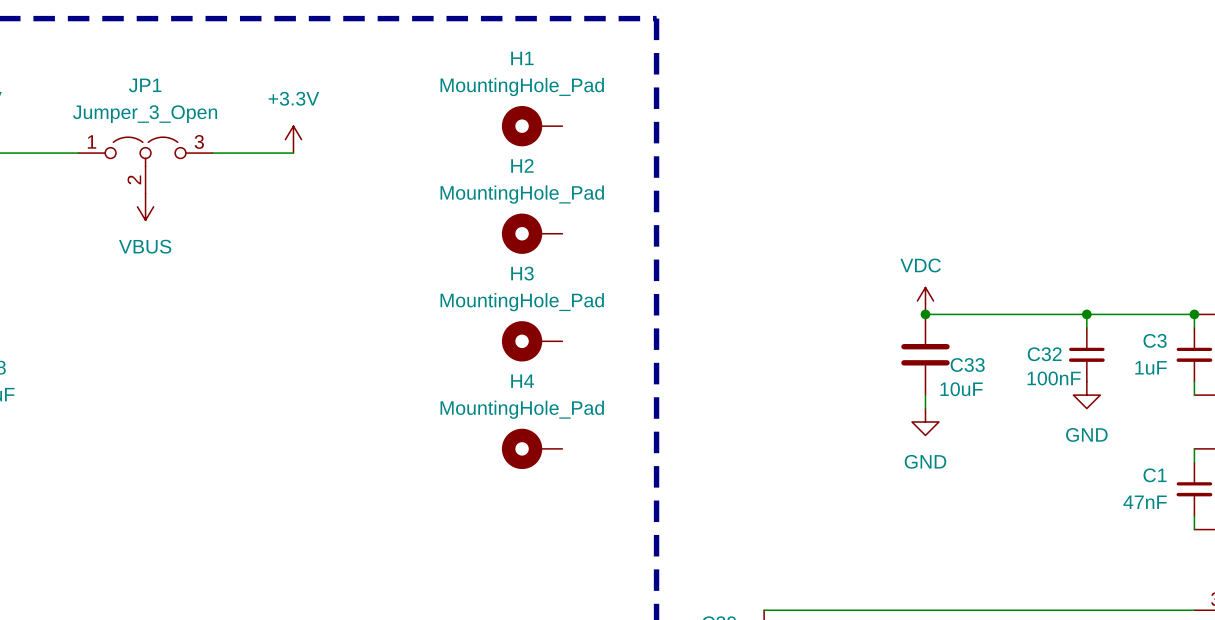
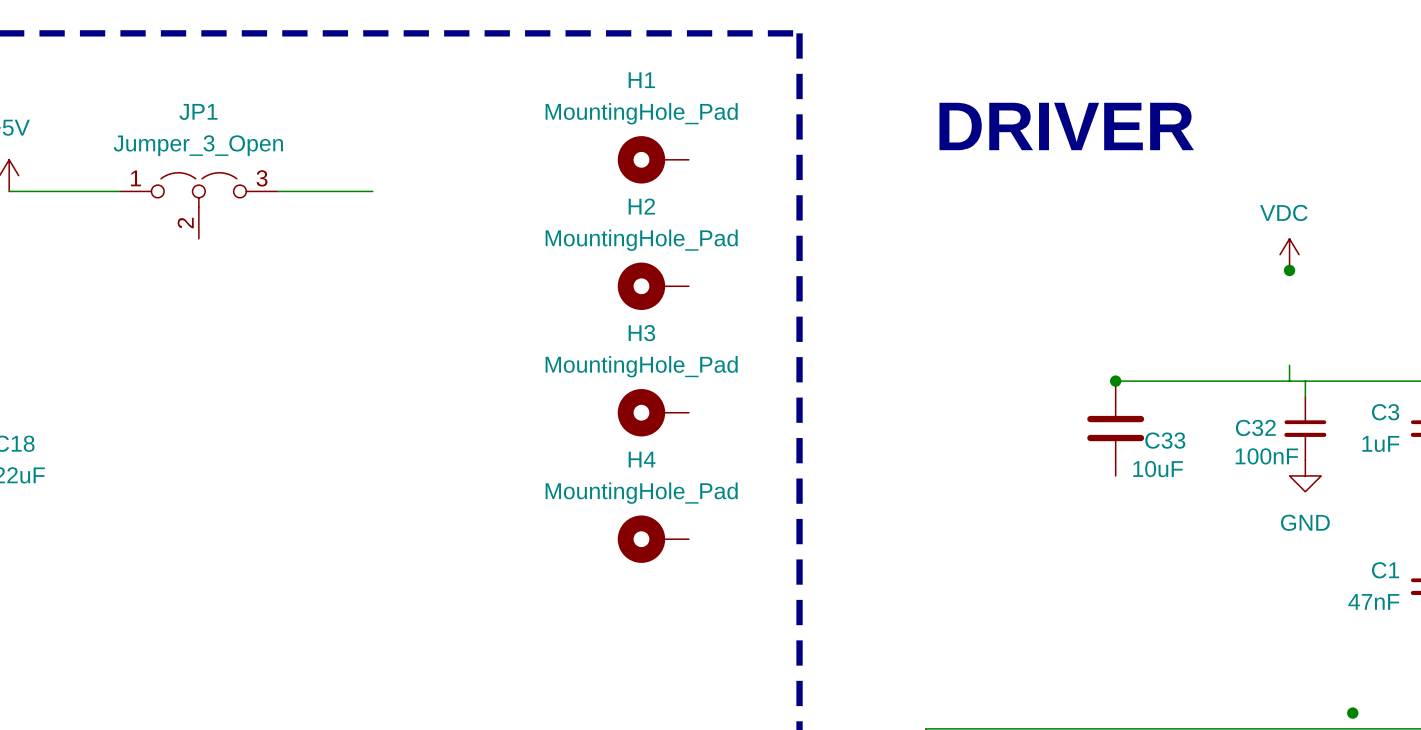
text: none -> DRIVER (1066, 126)
power symbol: +3.3V (293, 139) -> none
power symbol: VBUS (145, 206) -> none
junction: none -> (1289, 270)
power symbol position: VDC (925, 300) -> VDC (1289, 254)
junction: (1086, 314) -> none
wire: (925, 395) (925, 408) -> (1289, 365) (1289, 381)
power symbol: GND (925, 422) -> none
junction: none -> (1352, 713)

